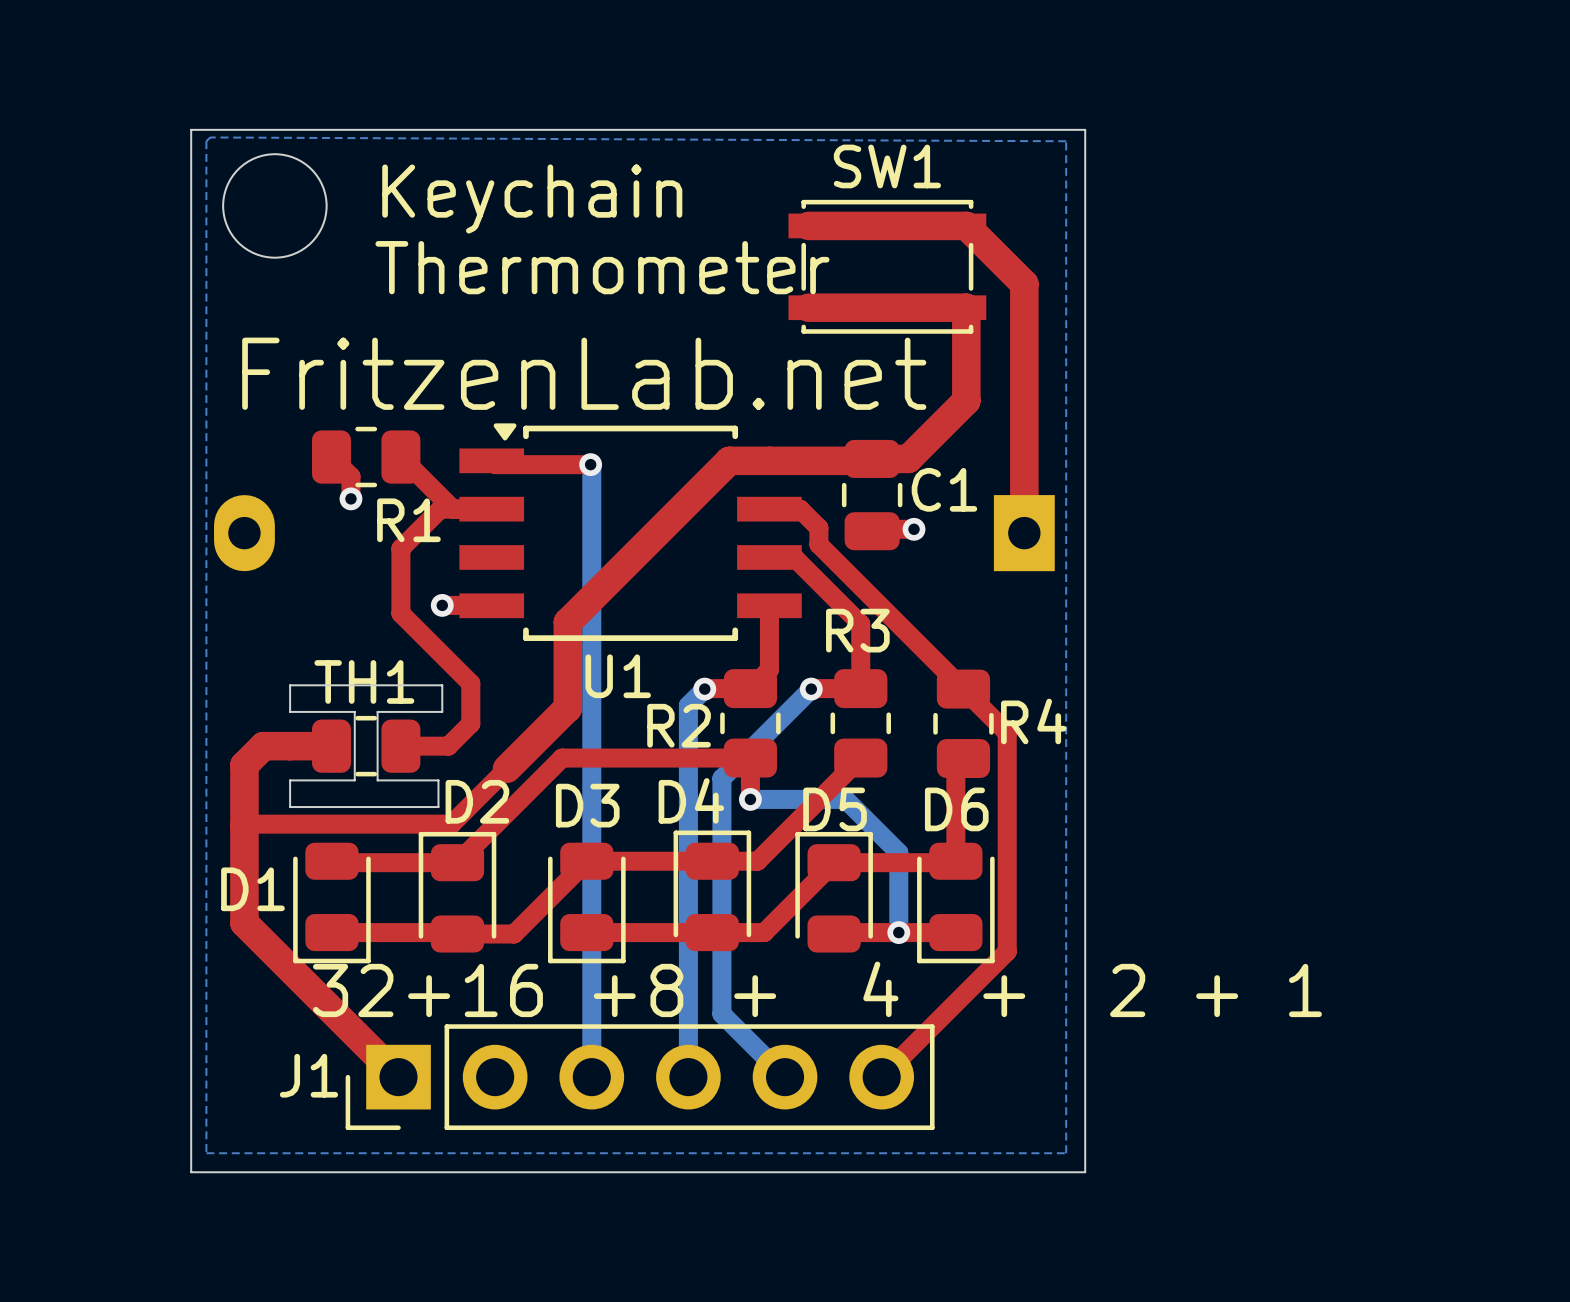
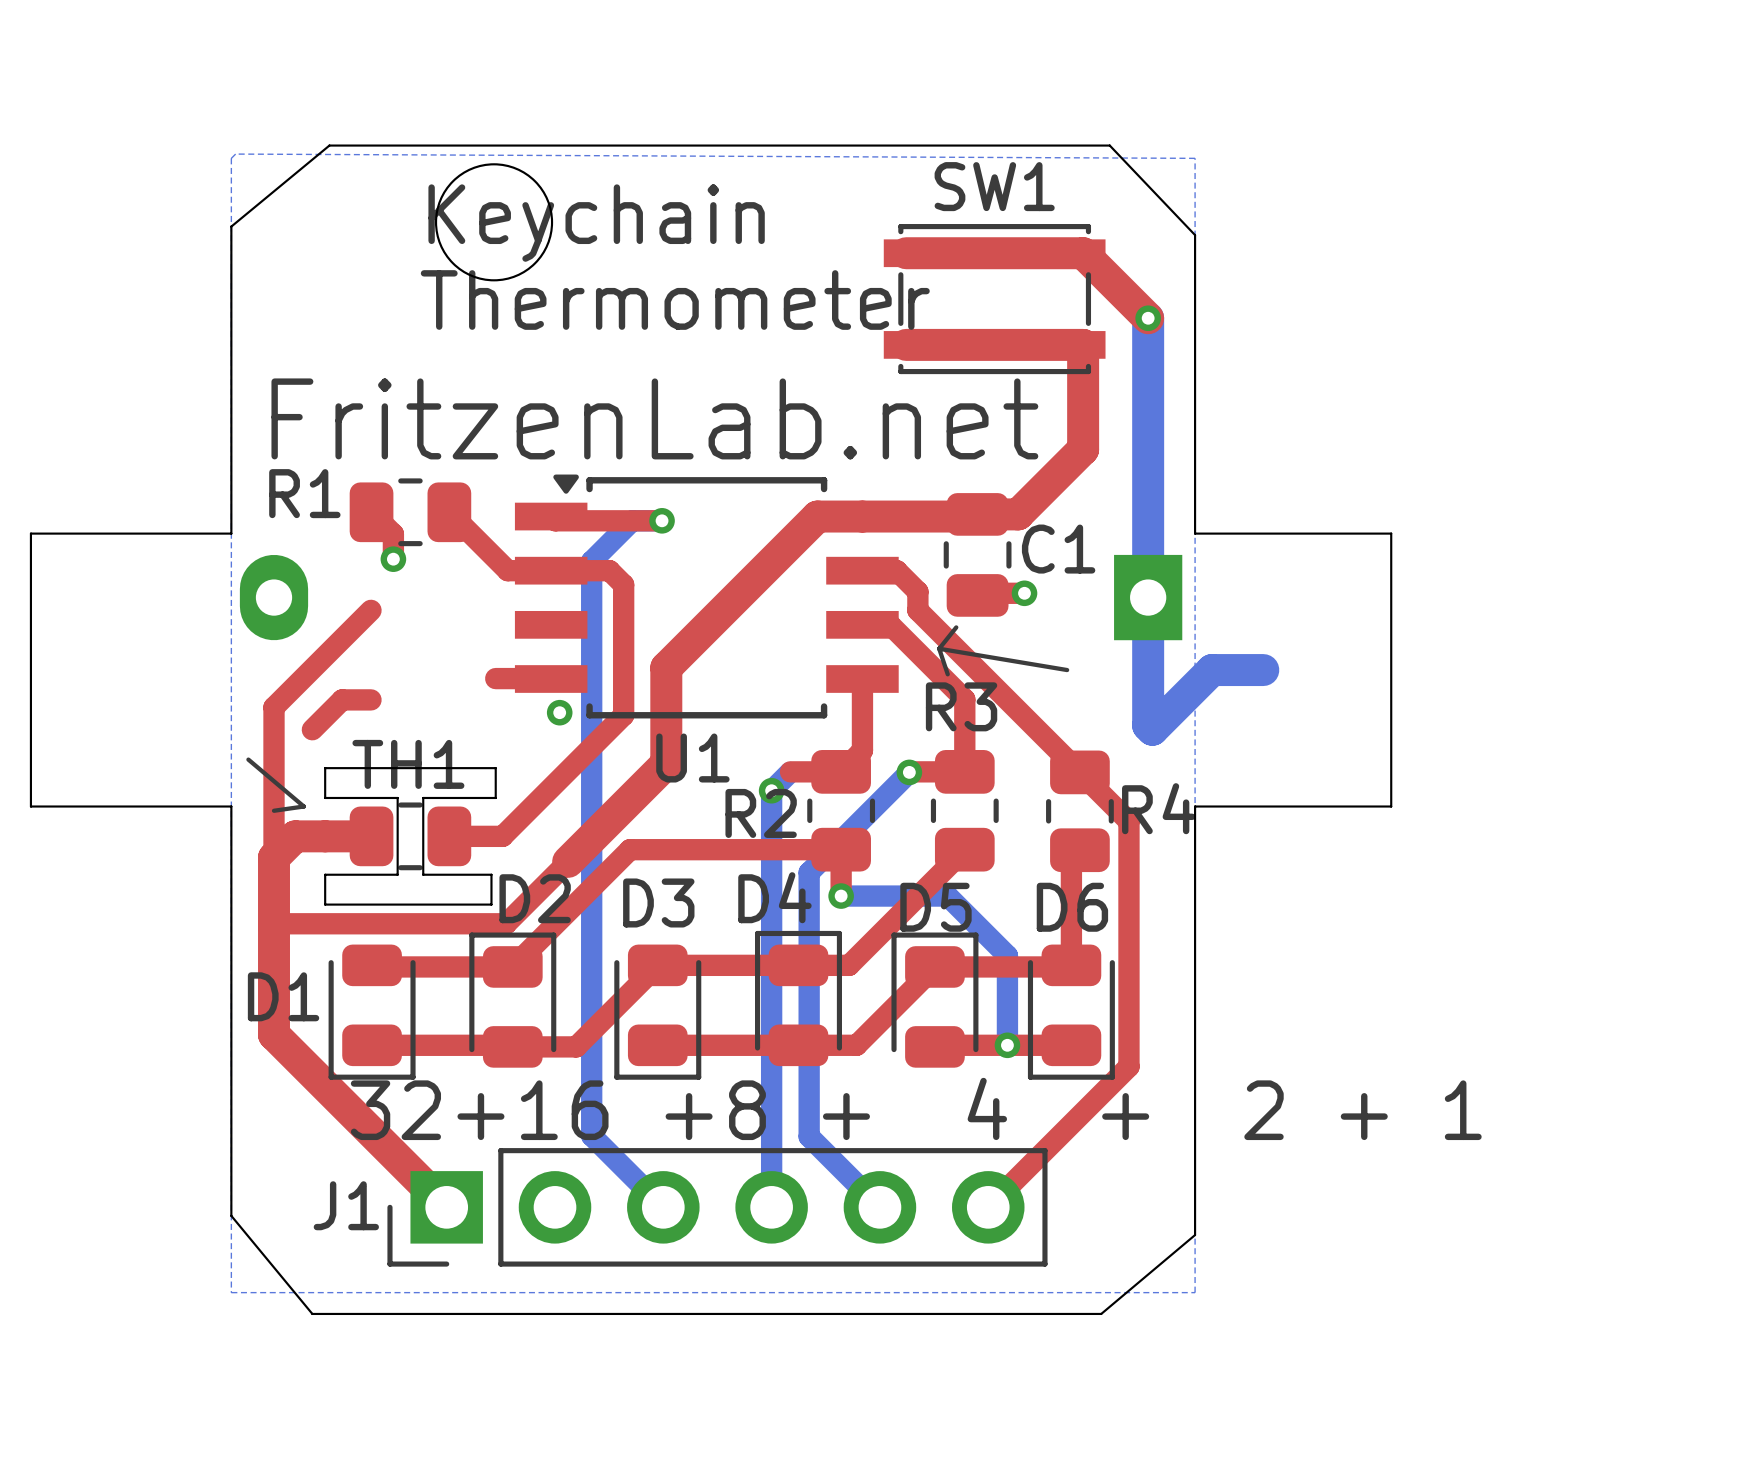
board edge: (293, 129) (191, 129) (191, 1172) (278, 1172) -> (329, 145) (231, 226) (231, 533) (30, 533) (30, 806) (231, 806) (231, 1215) (312, 1313)
board edge: (990, 129) (1085, 129) (1085, 1172) (982, 1172) -> (1109, 145) (1195, 235) (1195, 533) (1391, 533) (1391, 806) (1195, 806) (1195, 1235) (1101, 1313)
round board edge position: (274, 205) -> (494, 222)
top track: (1024, 283) (1024, 533) -> none
bottom track: none -> (1148, 318) (1148, 725) (1152, 729) (1212, 670) (1263, 670)
via: none -> (1148, 318)
bottom track: (591, 465) (591, 1077) -> (662, 520) (632, 520) (591, 561) (591, 1135) (663, 1207)
top track: (453, 509) (440, 509) (400, 548) (400, 613) (470, 683) (470, 723) -> (551, 570) (609, 570) (623, 584) (623, 715) (527, 811)
R1 name position: R1 (408, 520) -> R1 (304, 493)
top track: none -> (371, 610) (274, 707) (274, 857)
line: none -> (956, 627) (939, 648)
line: none -> (939, 648) (947, 674)
line: none -> (939, 648) (1067, 670)
top track: (594, 595) (567, 622) (567, 708) -> (666, 667) (666, 763) (636, 793)
via position: (442, 605) -> (559, 712)
top track: none -> (371, 699) (342, 699) (312, 729)
line: none -> (248, 759) (303, 806) (274, 810)
via position: (704, 689) -> (771, 790)

